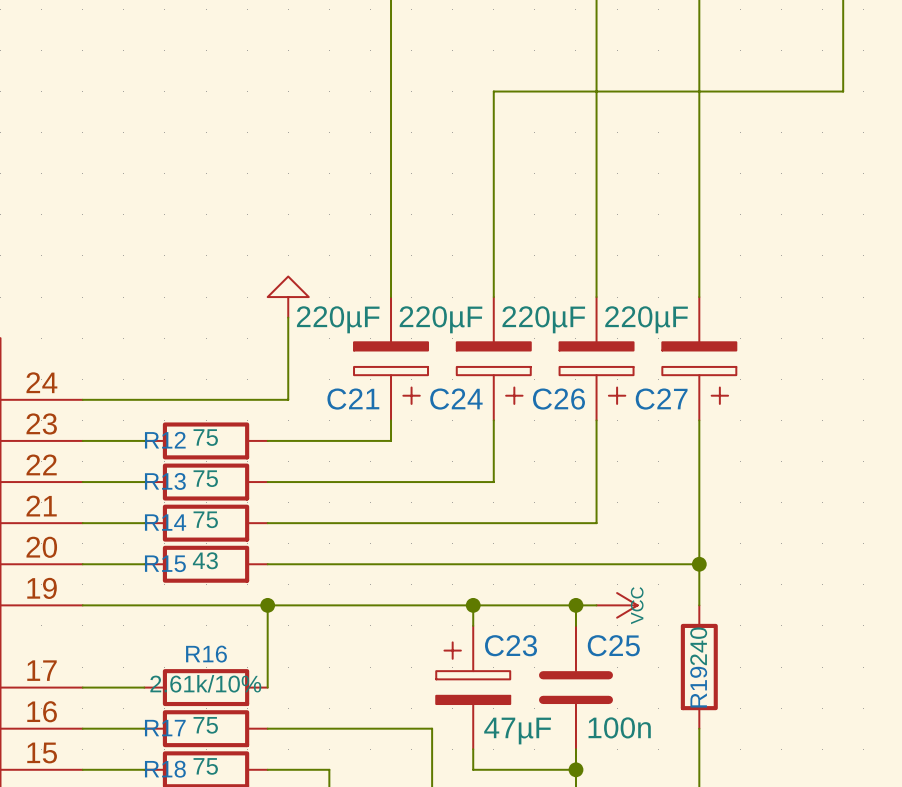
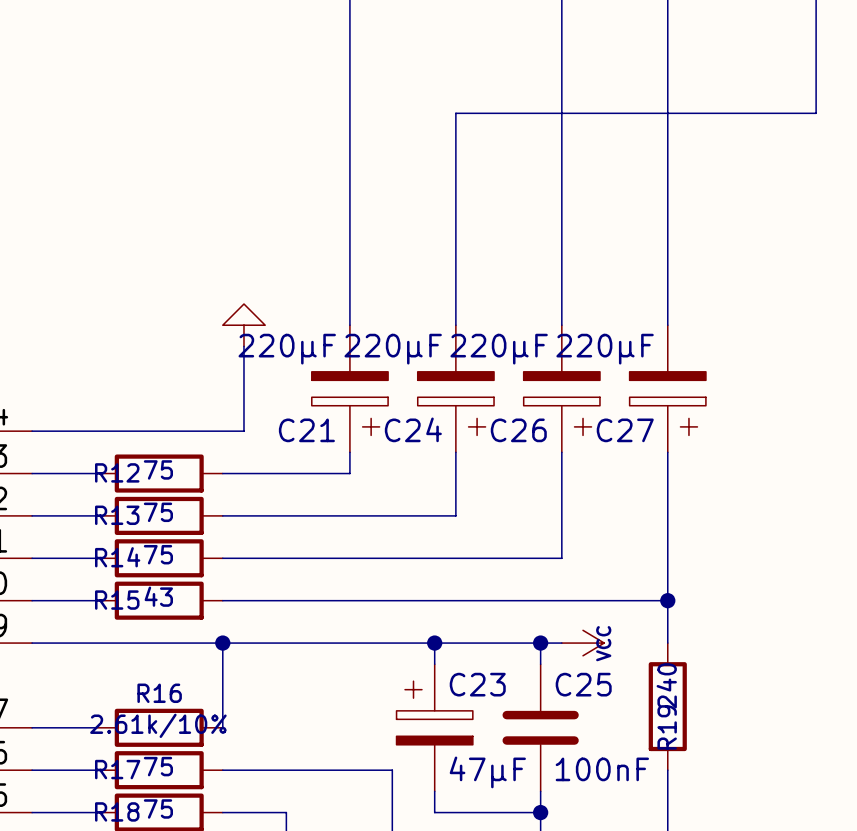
C25 value: 100n (619, 727) -> 100nF (602, 769)

